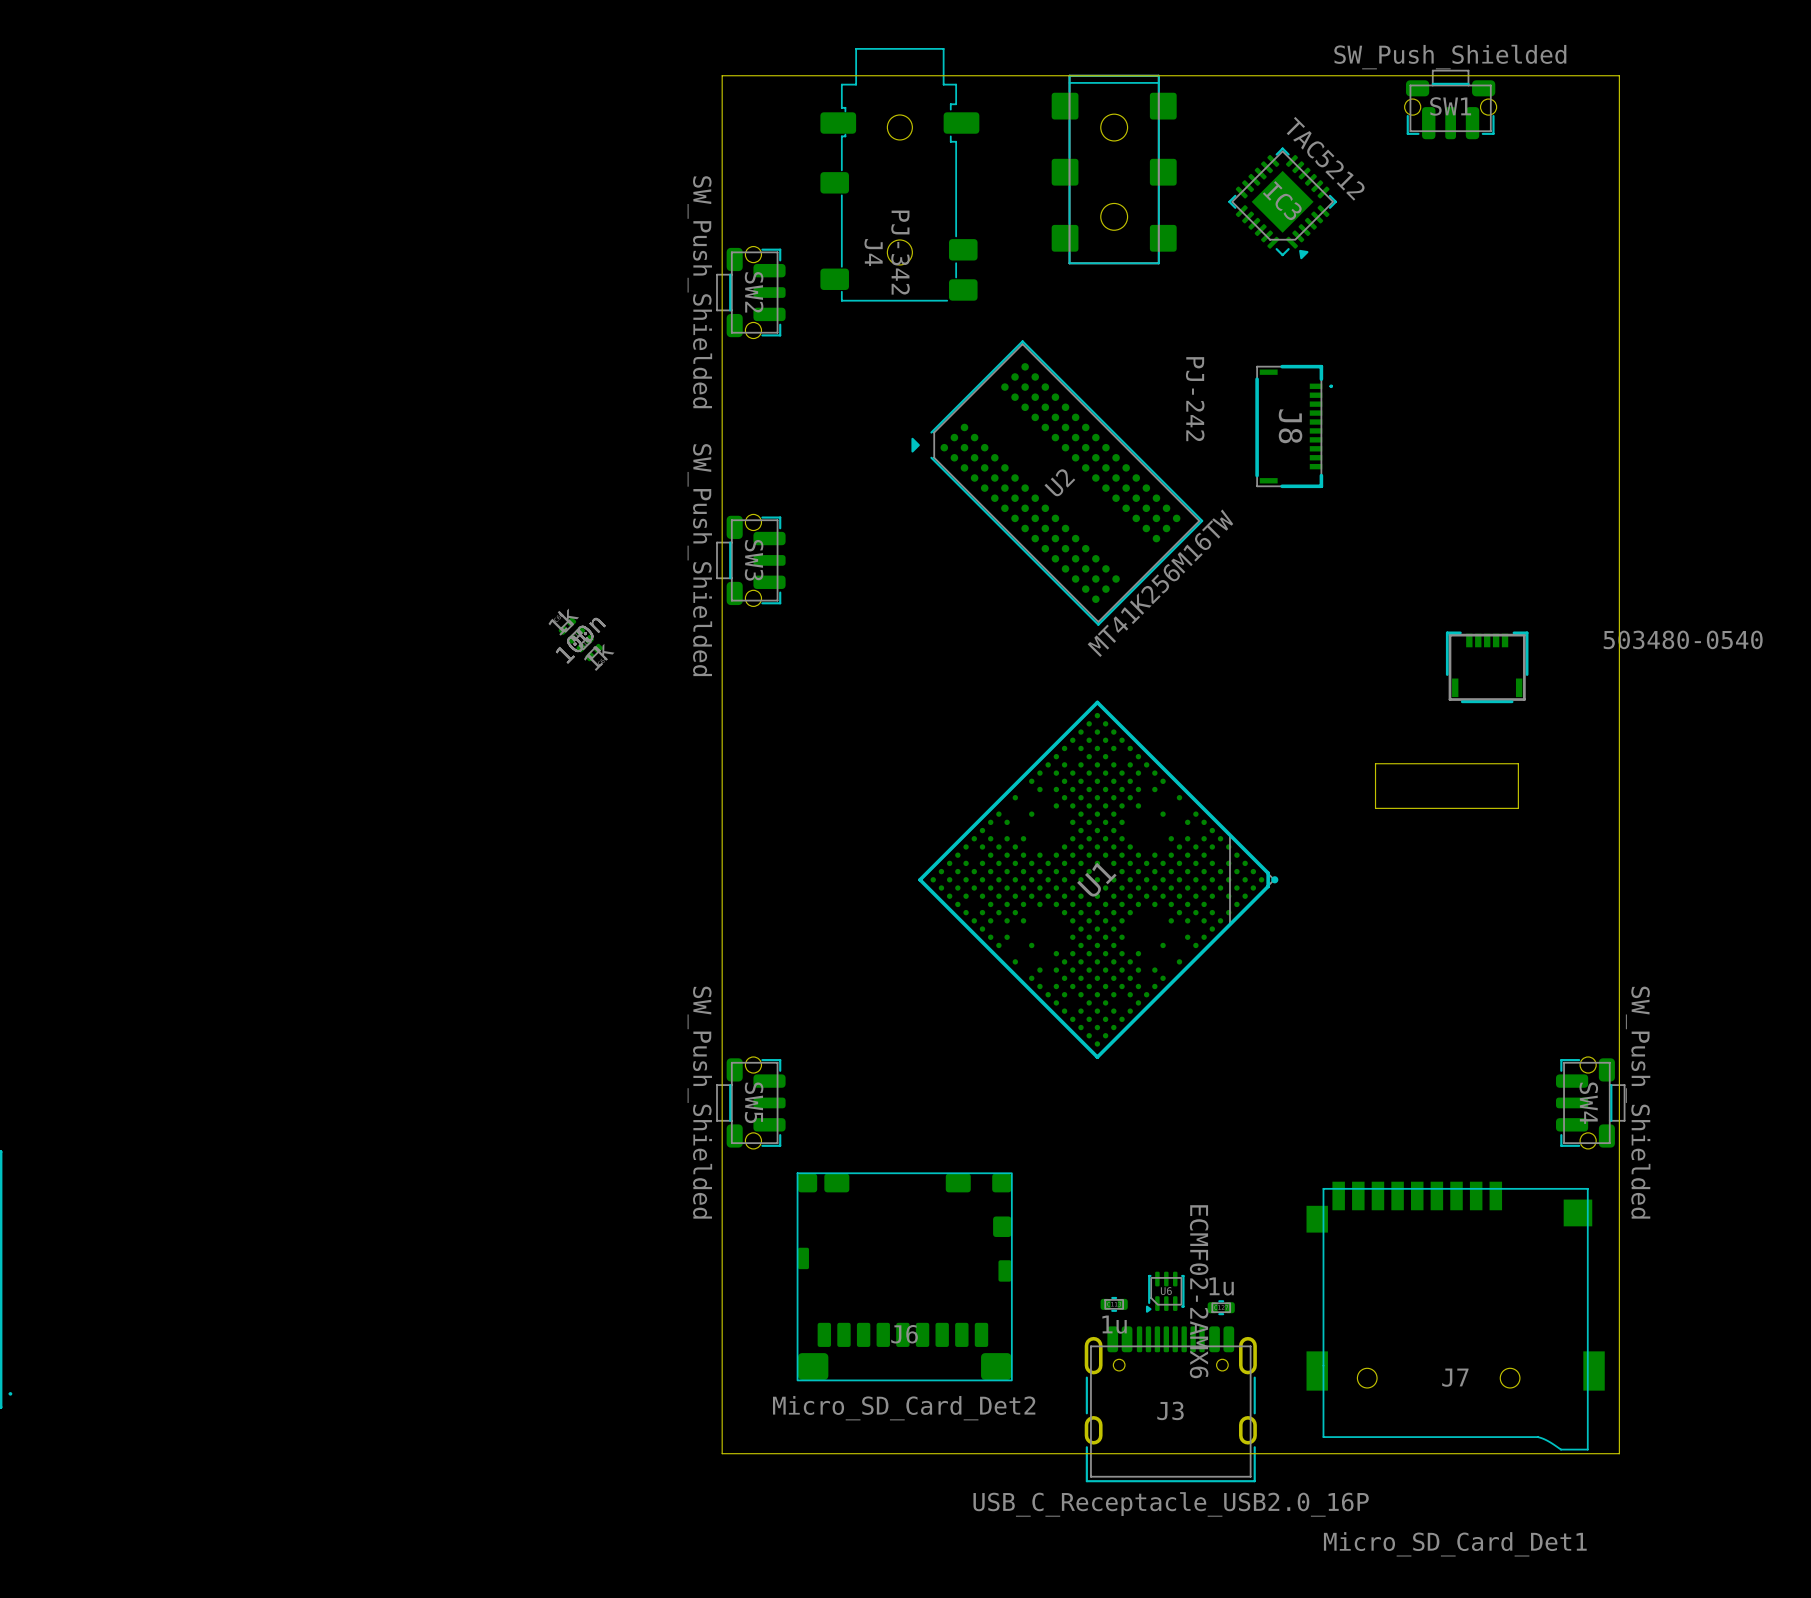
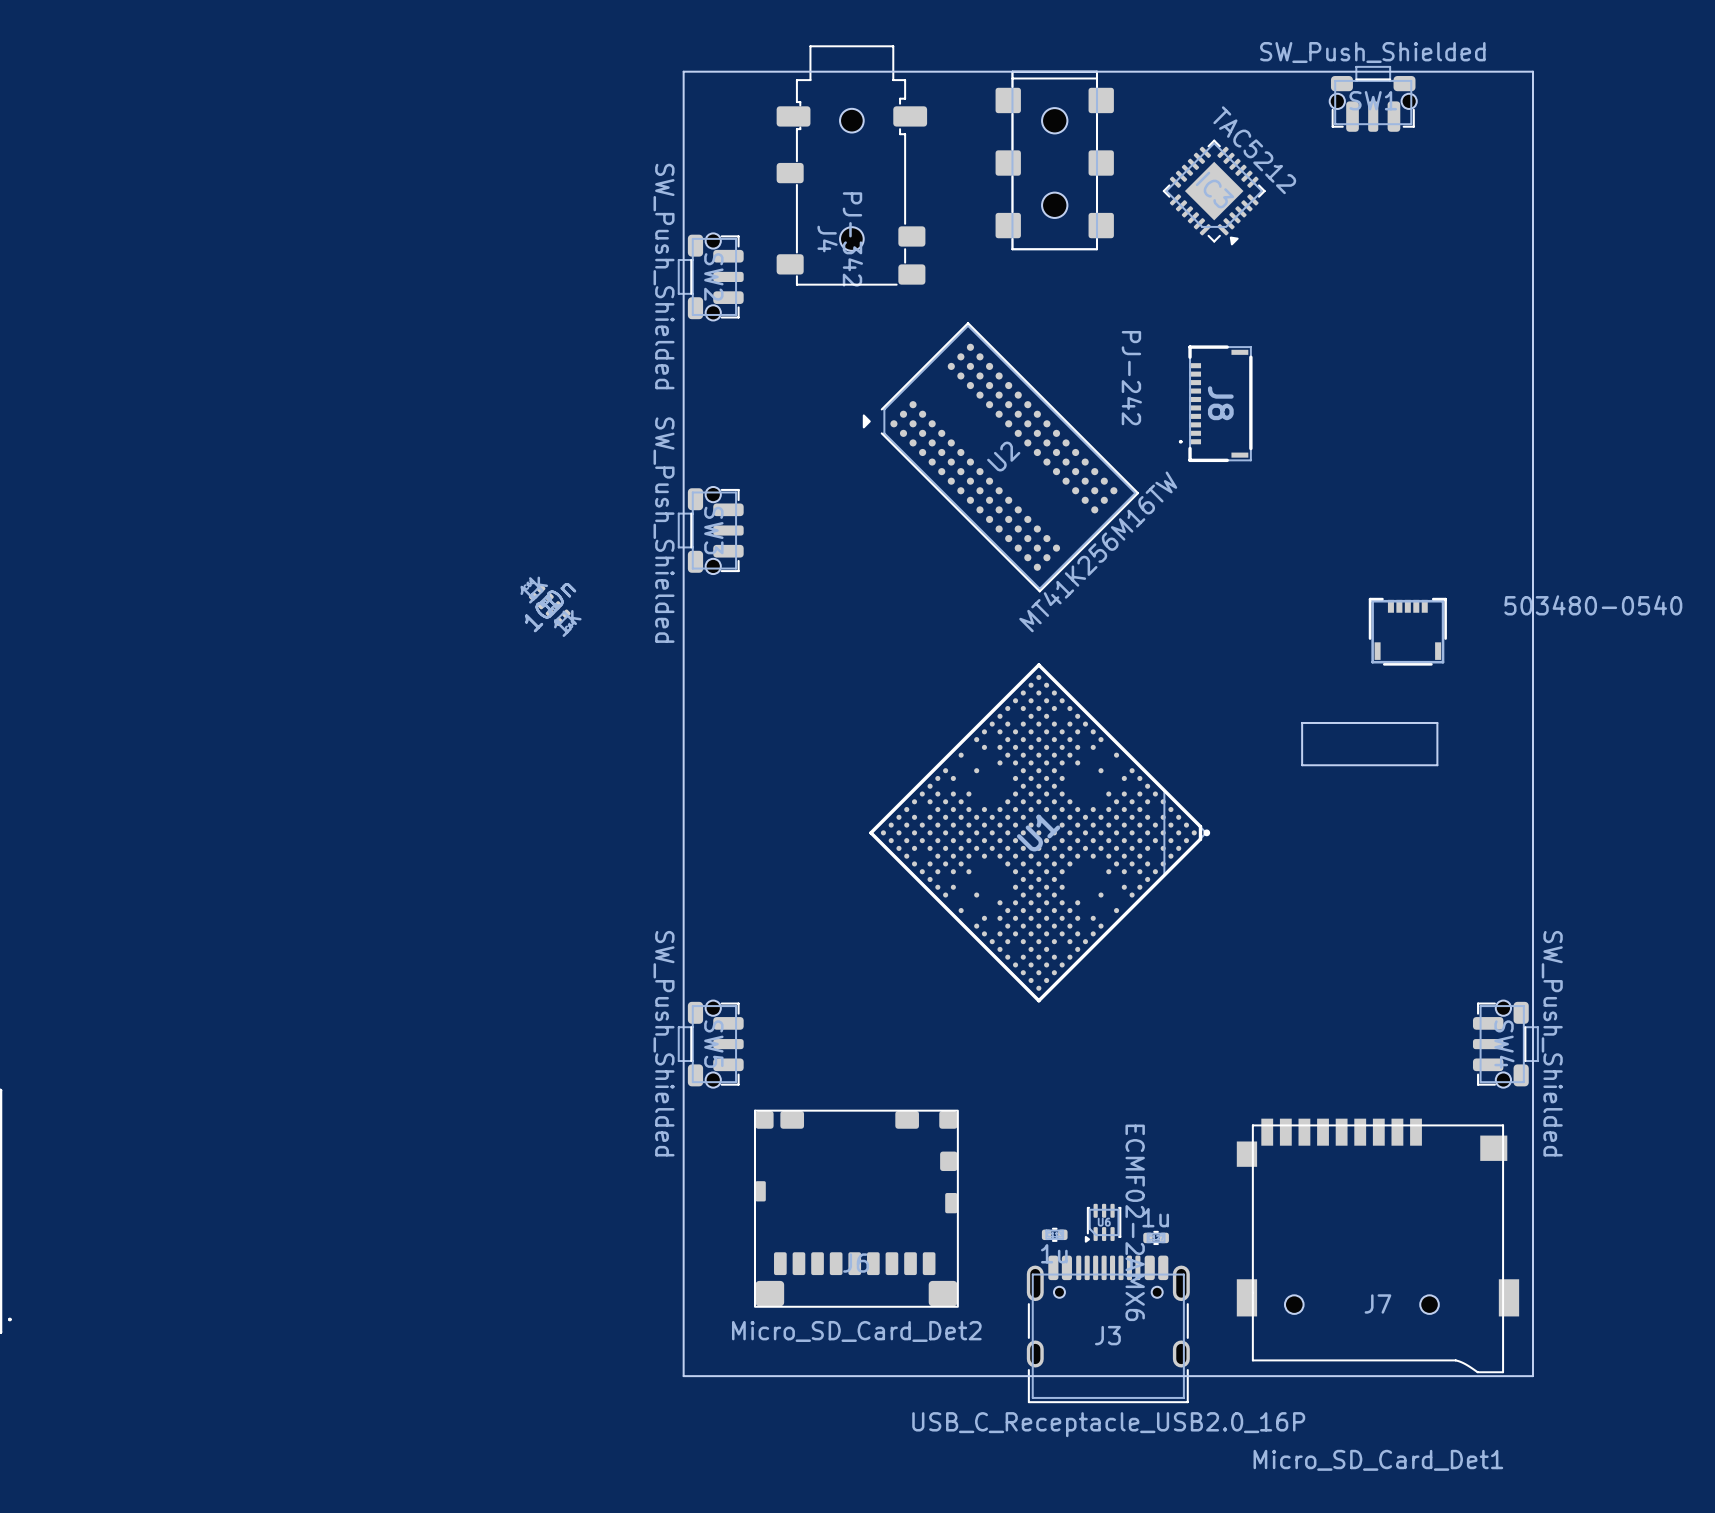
J8 rotation: 0° (1294, 426) -> 180° (1215, 403)

